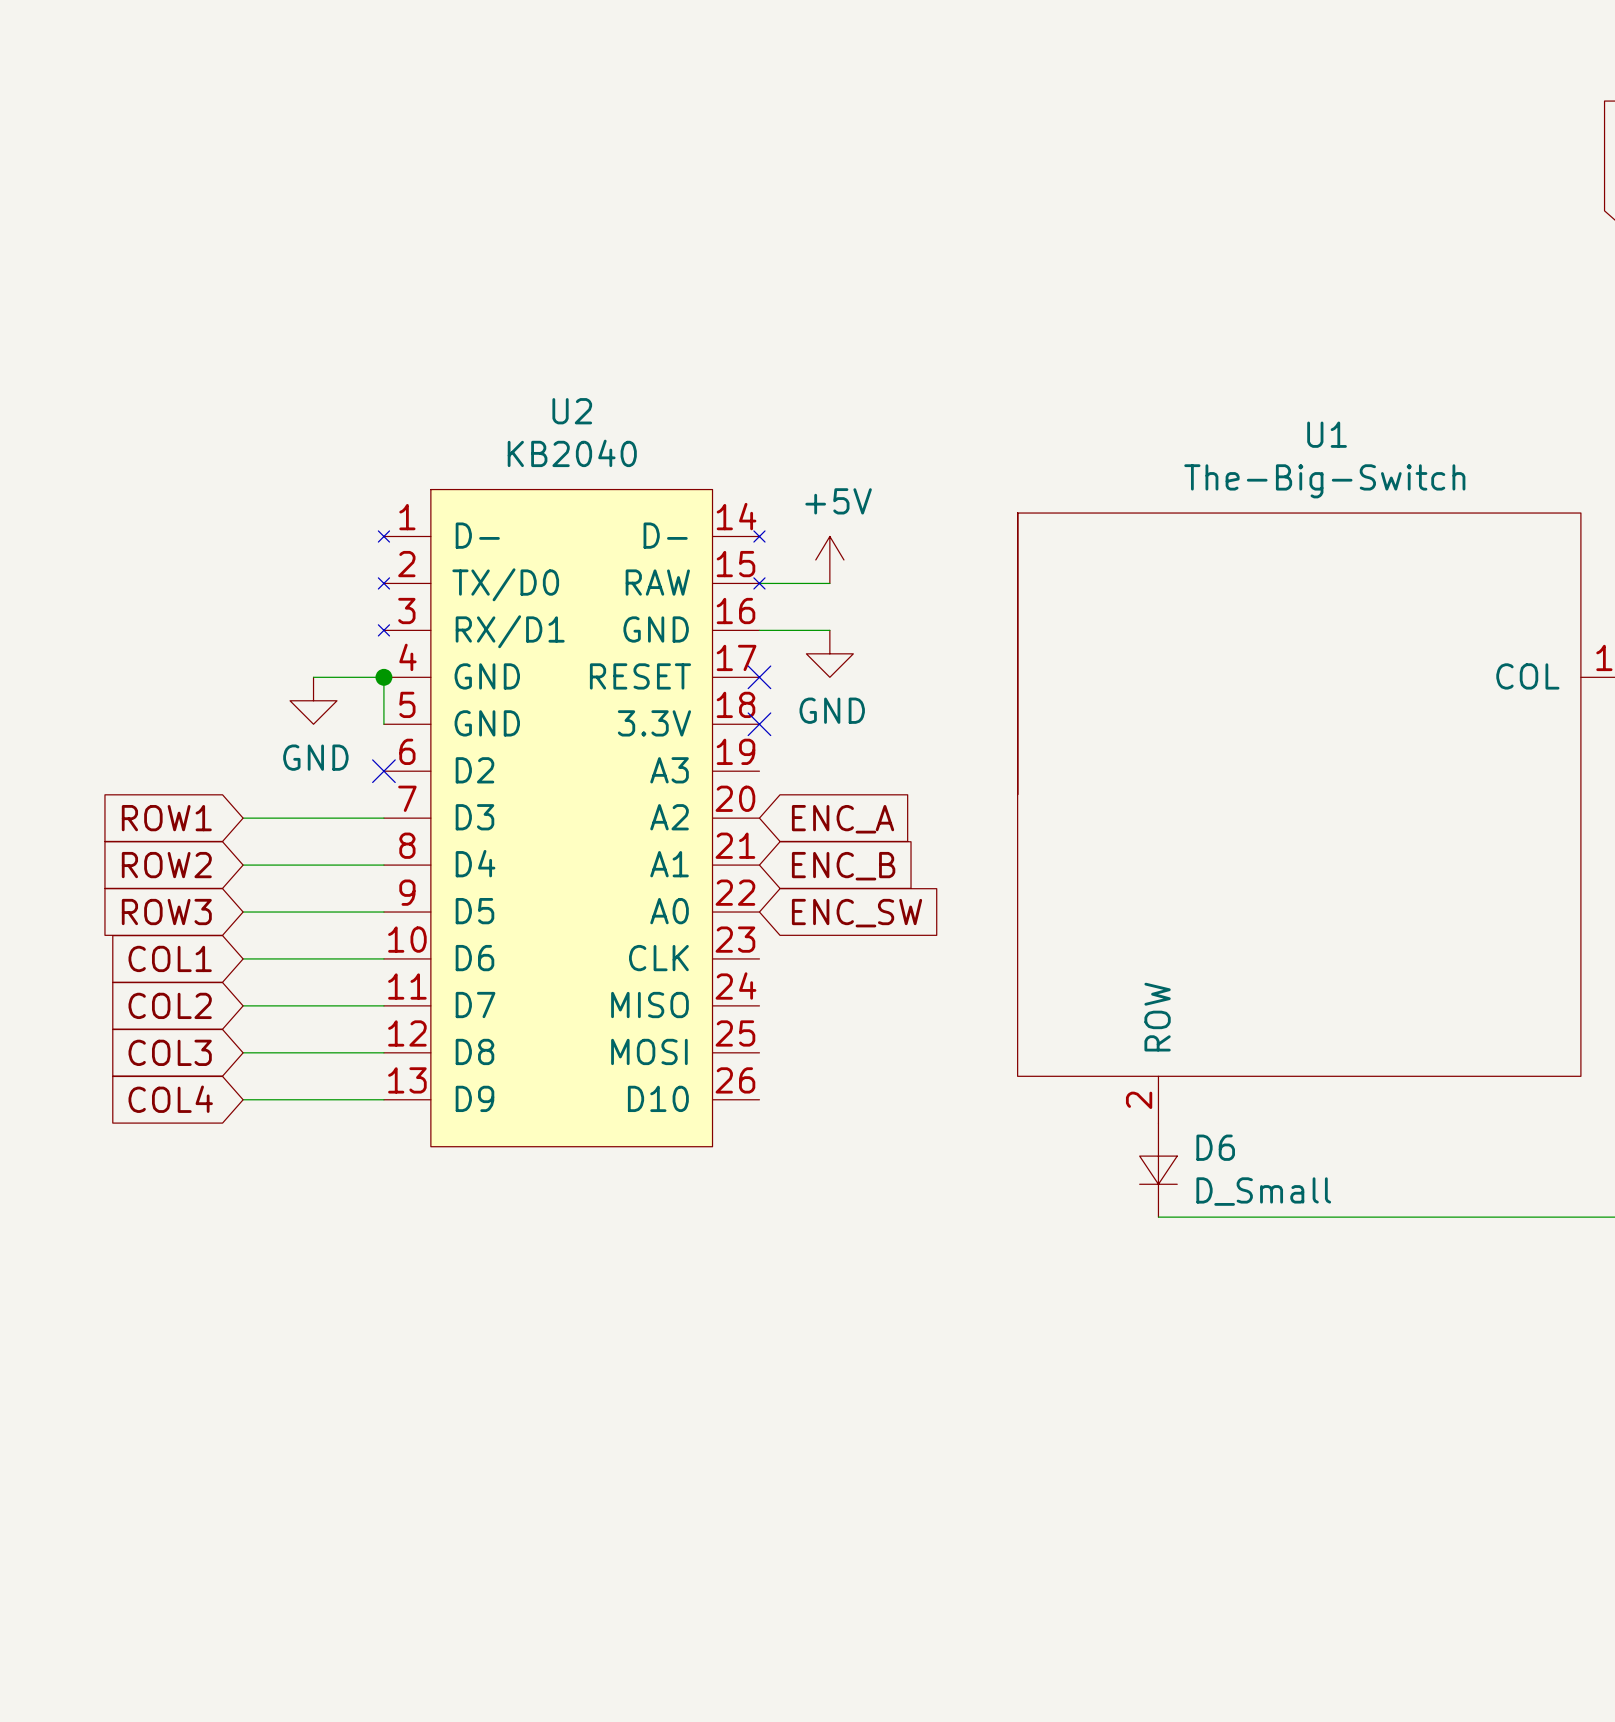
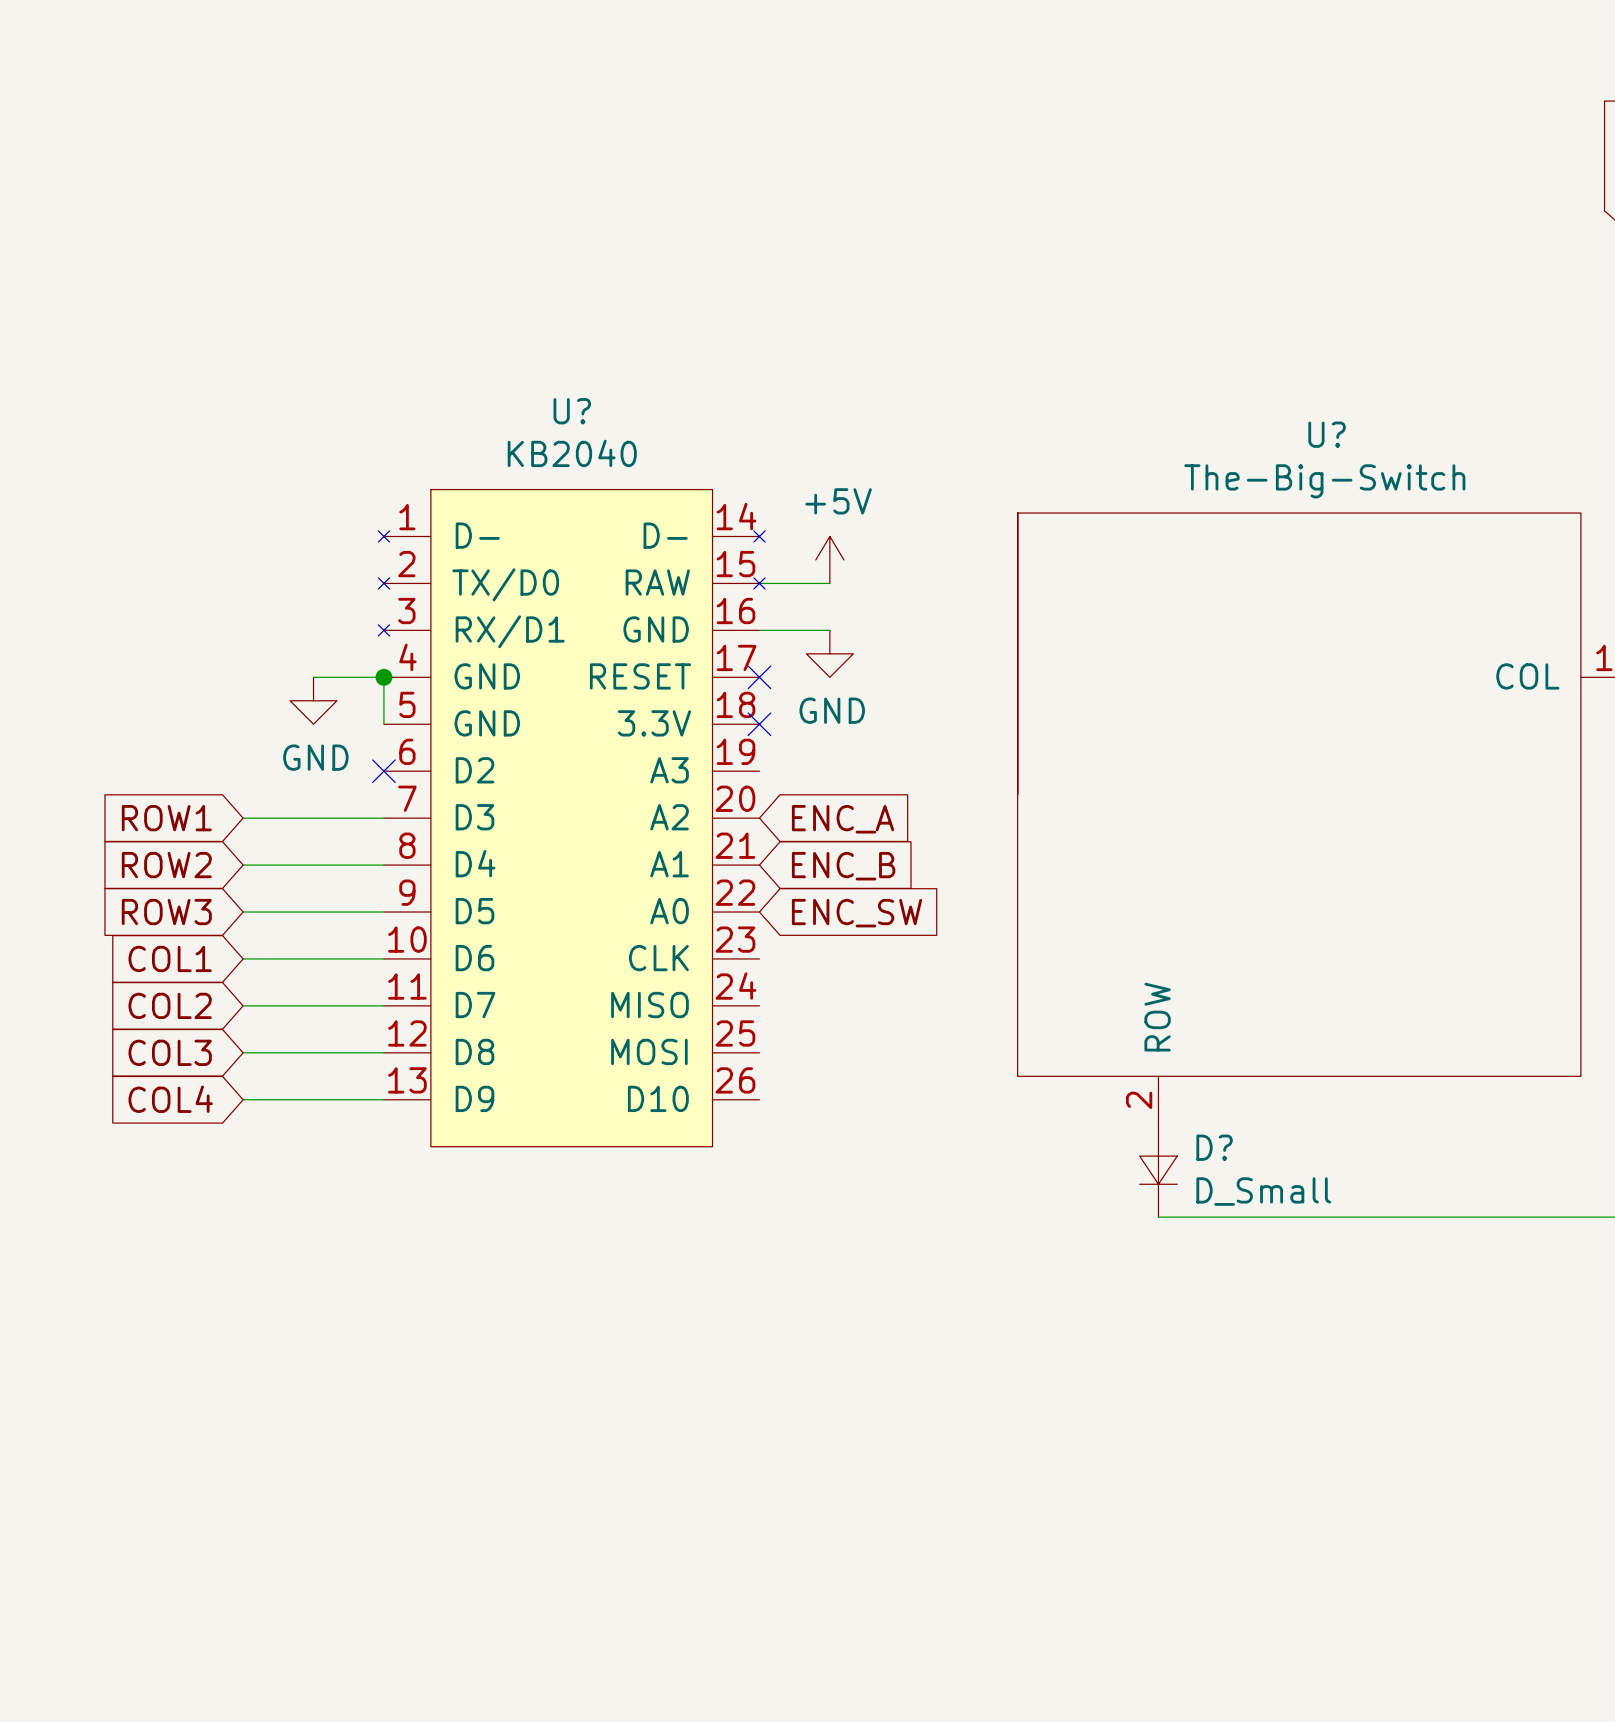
U2 name: U2 (572, 411) -> U? (572, 411)
U1 name: U1 (1327, 434) -> U? (1327, 434)
D6 name: D6 (1215, 1147) -> D? (1214, 1147)

